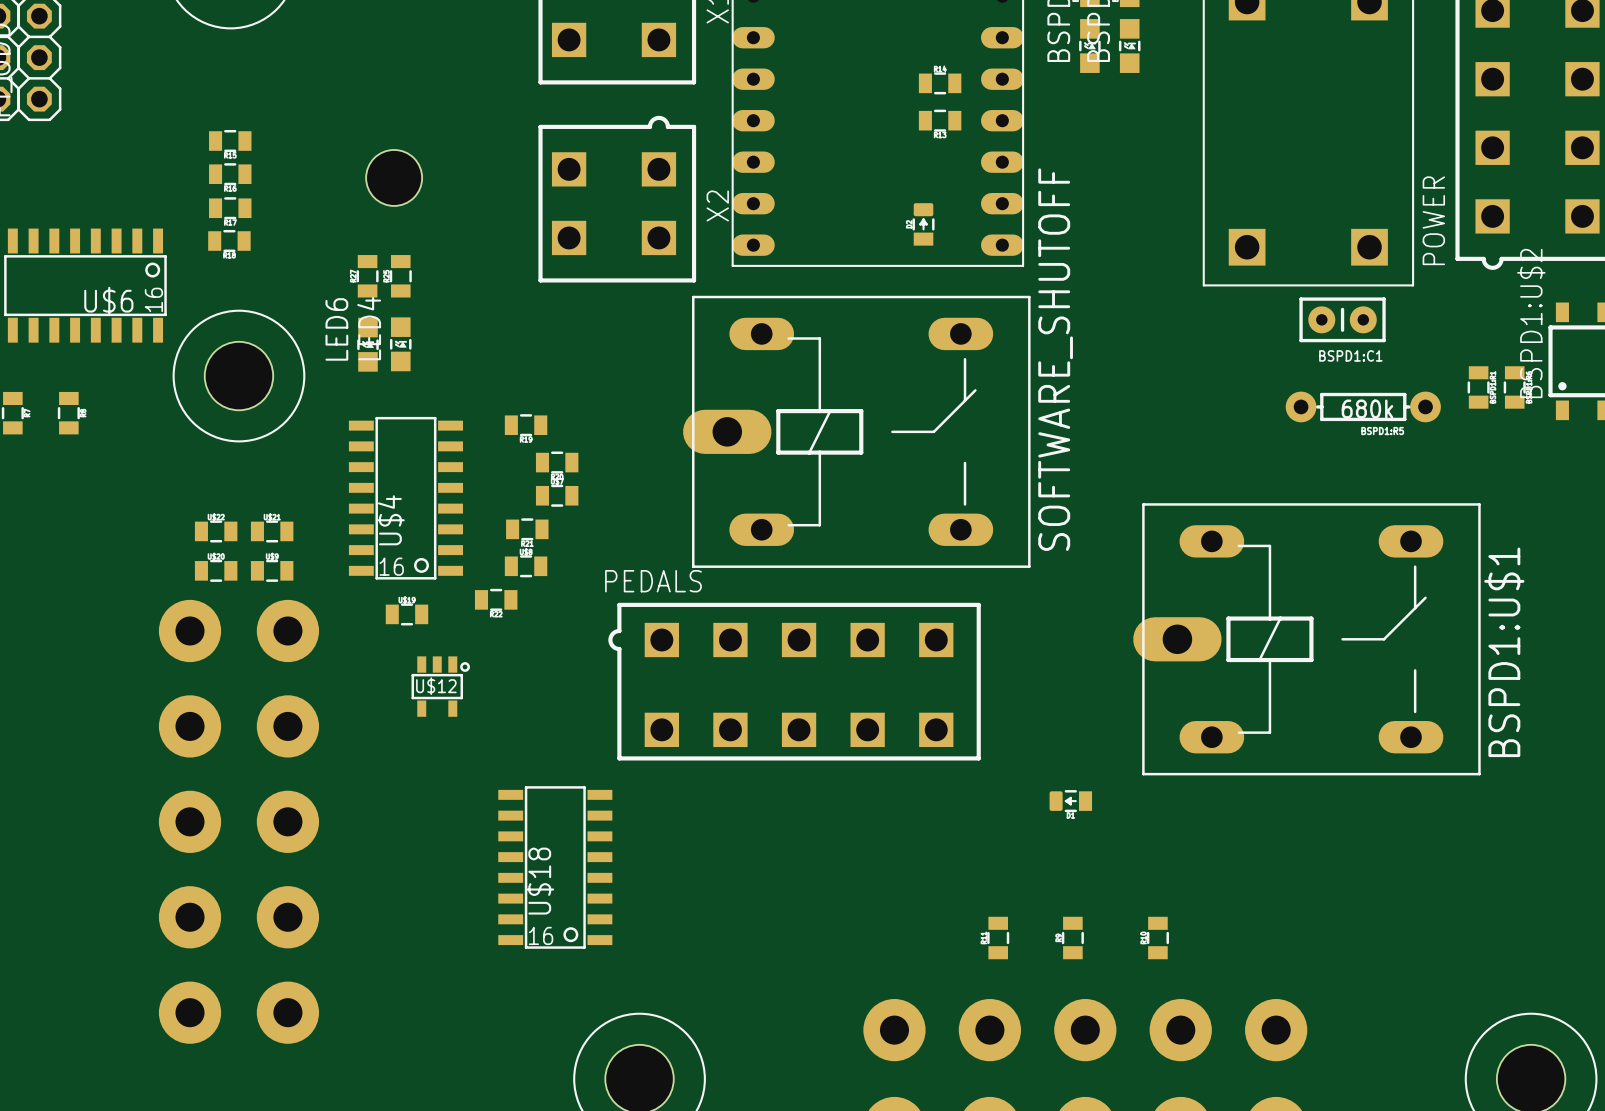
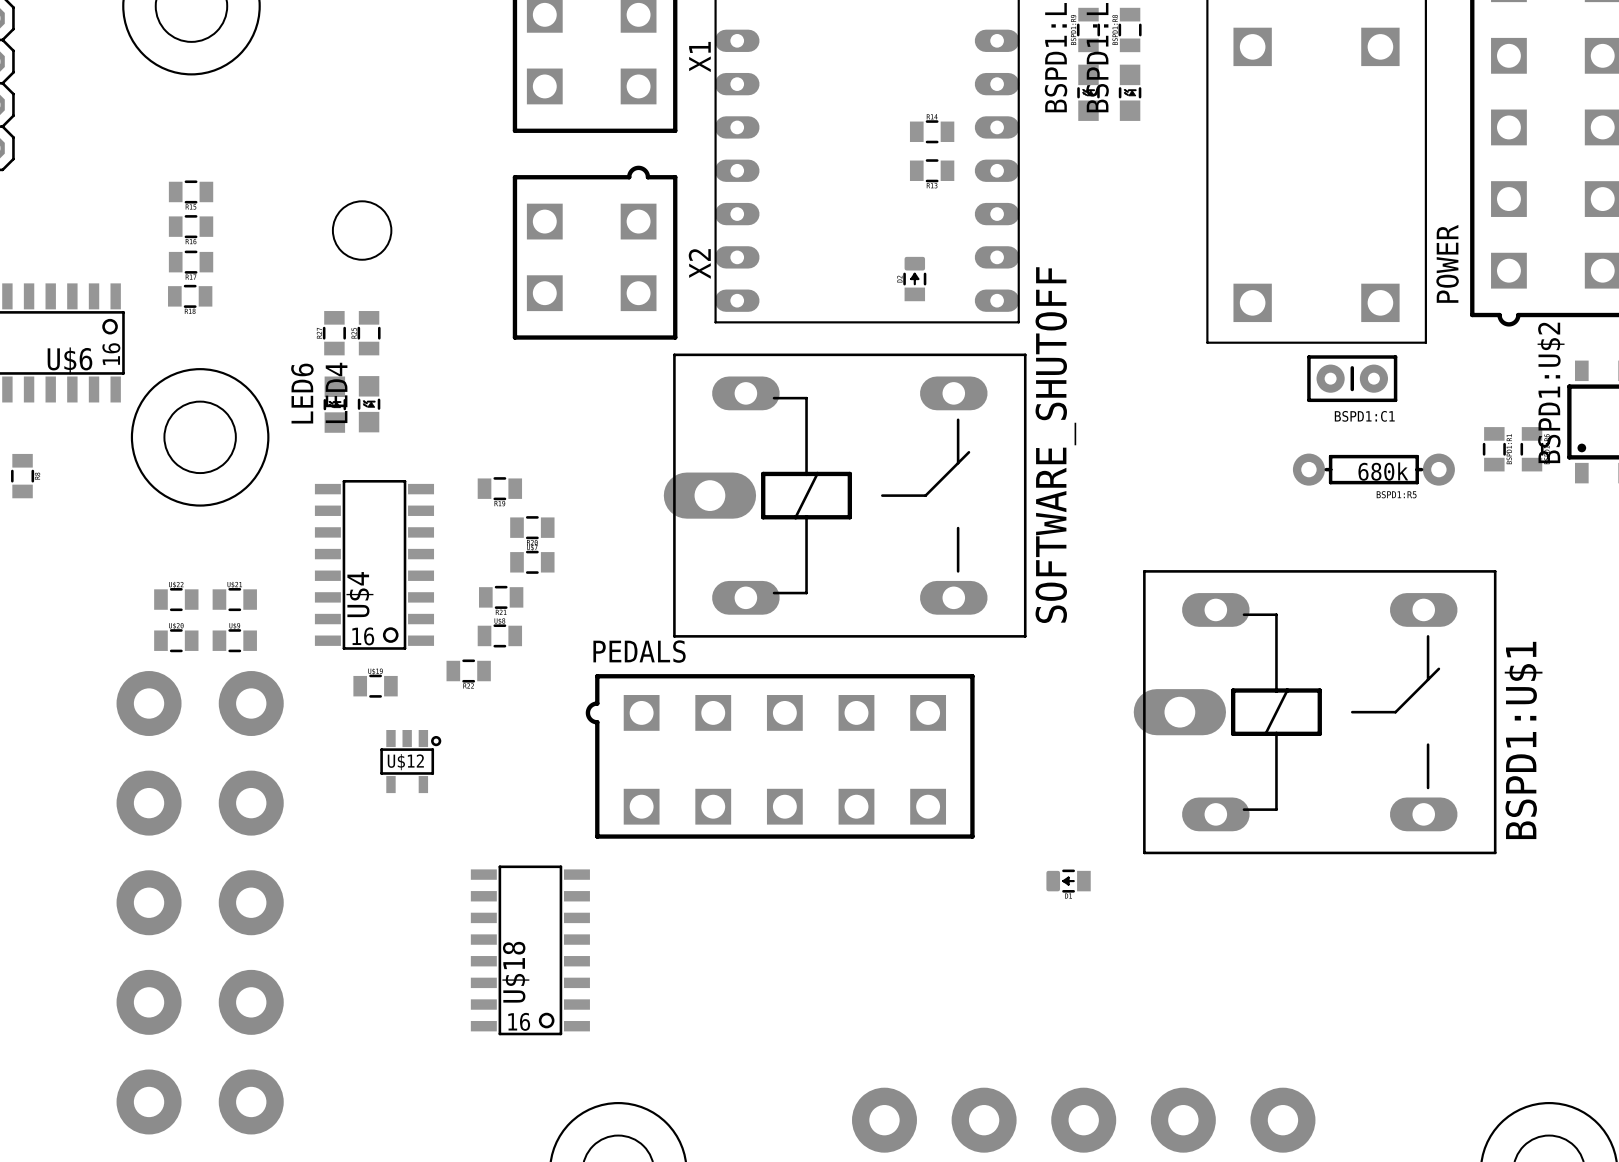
part: (998, 938) -> none
part: (1072, 938) -> none
part: (1157, 938) -> none

